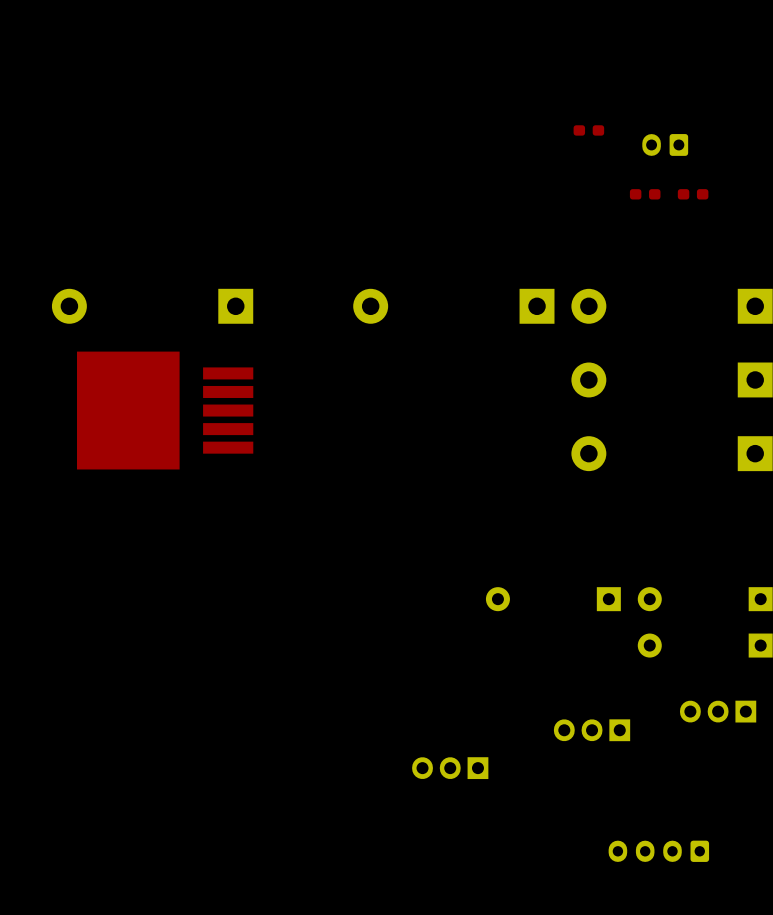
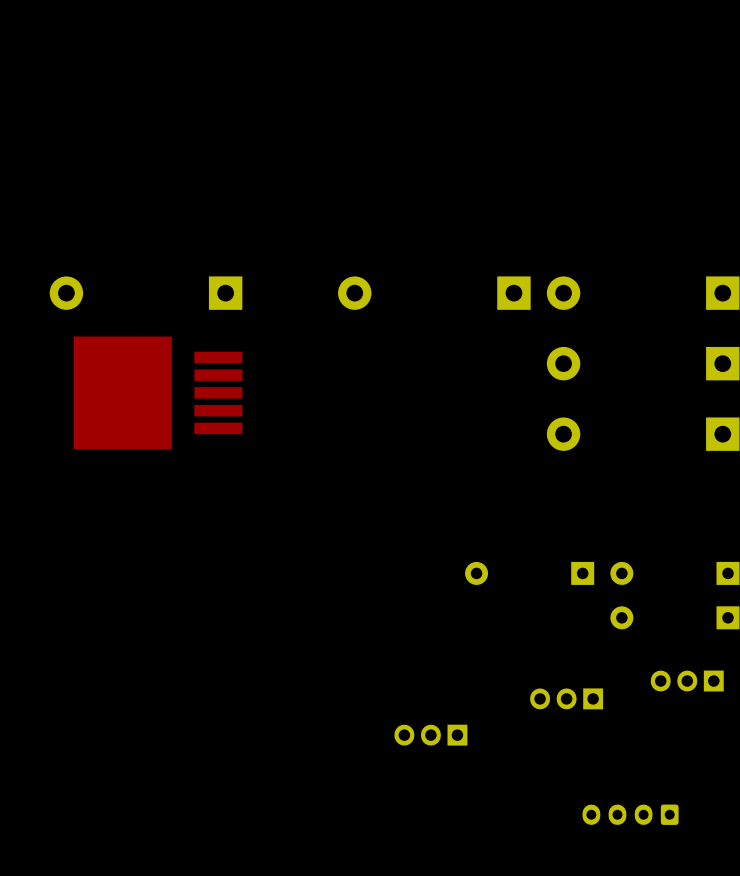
part: (588, 130) -> none
part: (665, 144) -> none
part: (645, 194) -> none
part: (693, 194) -> none

